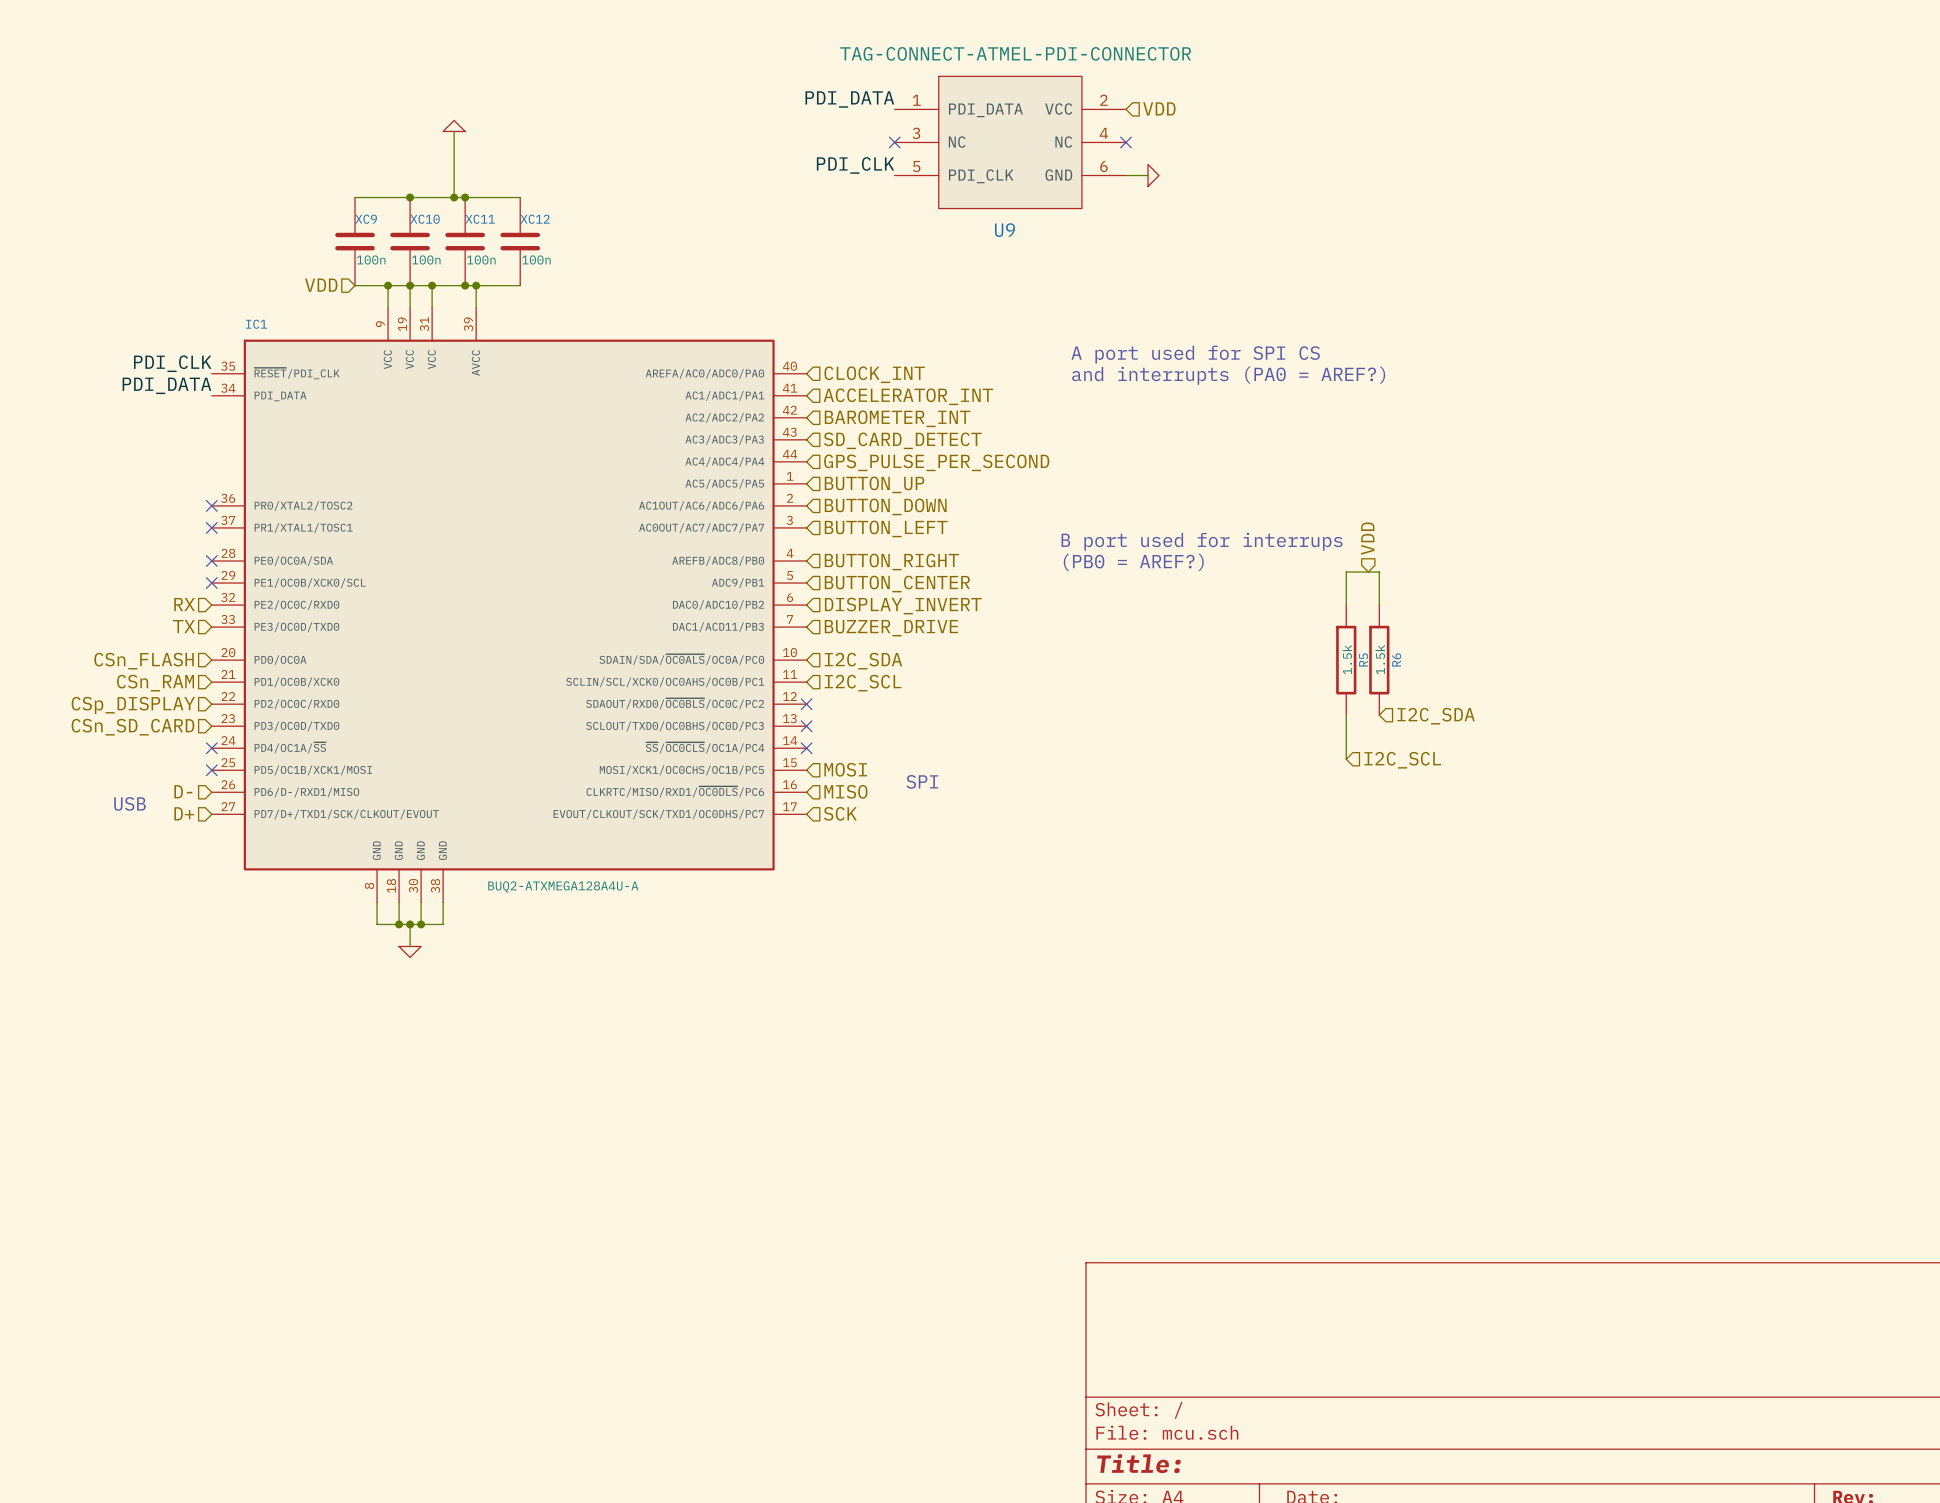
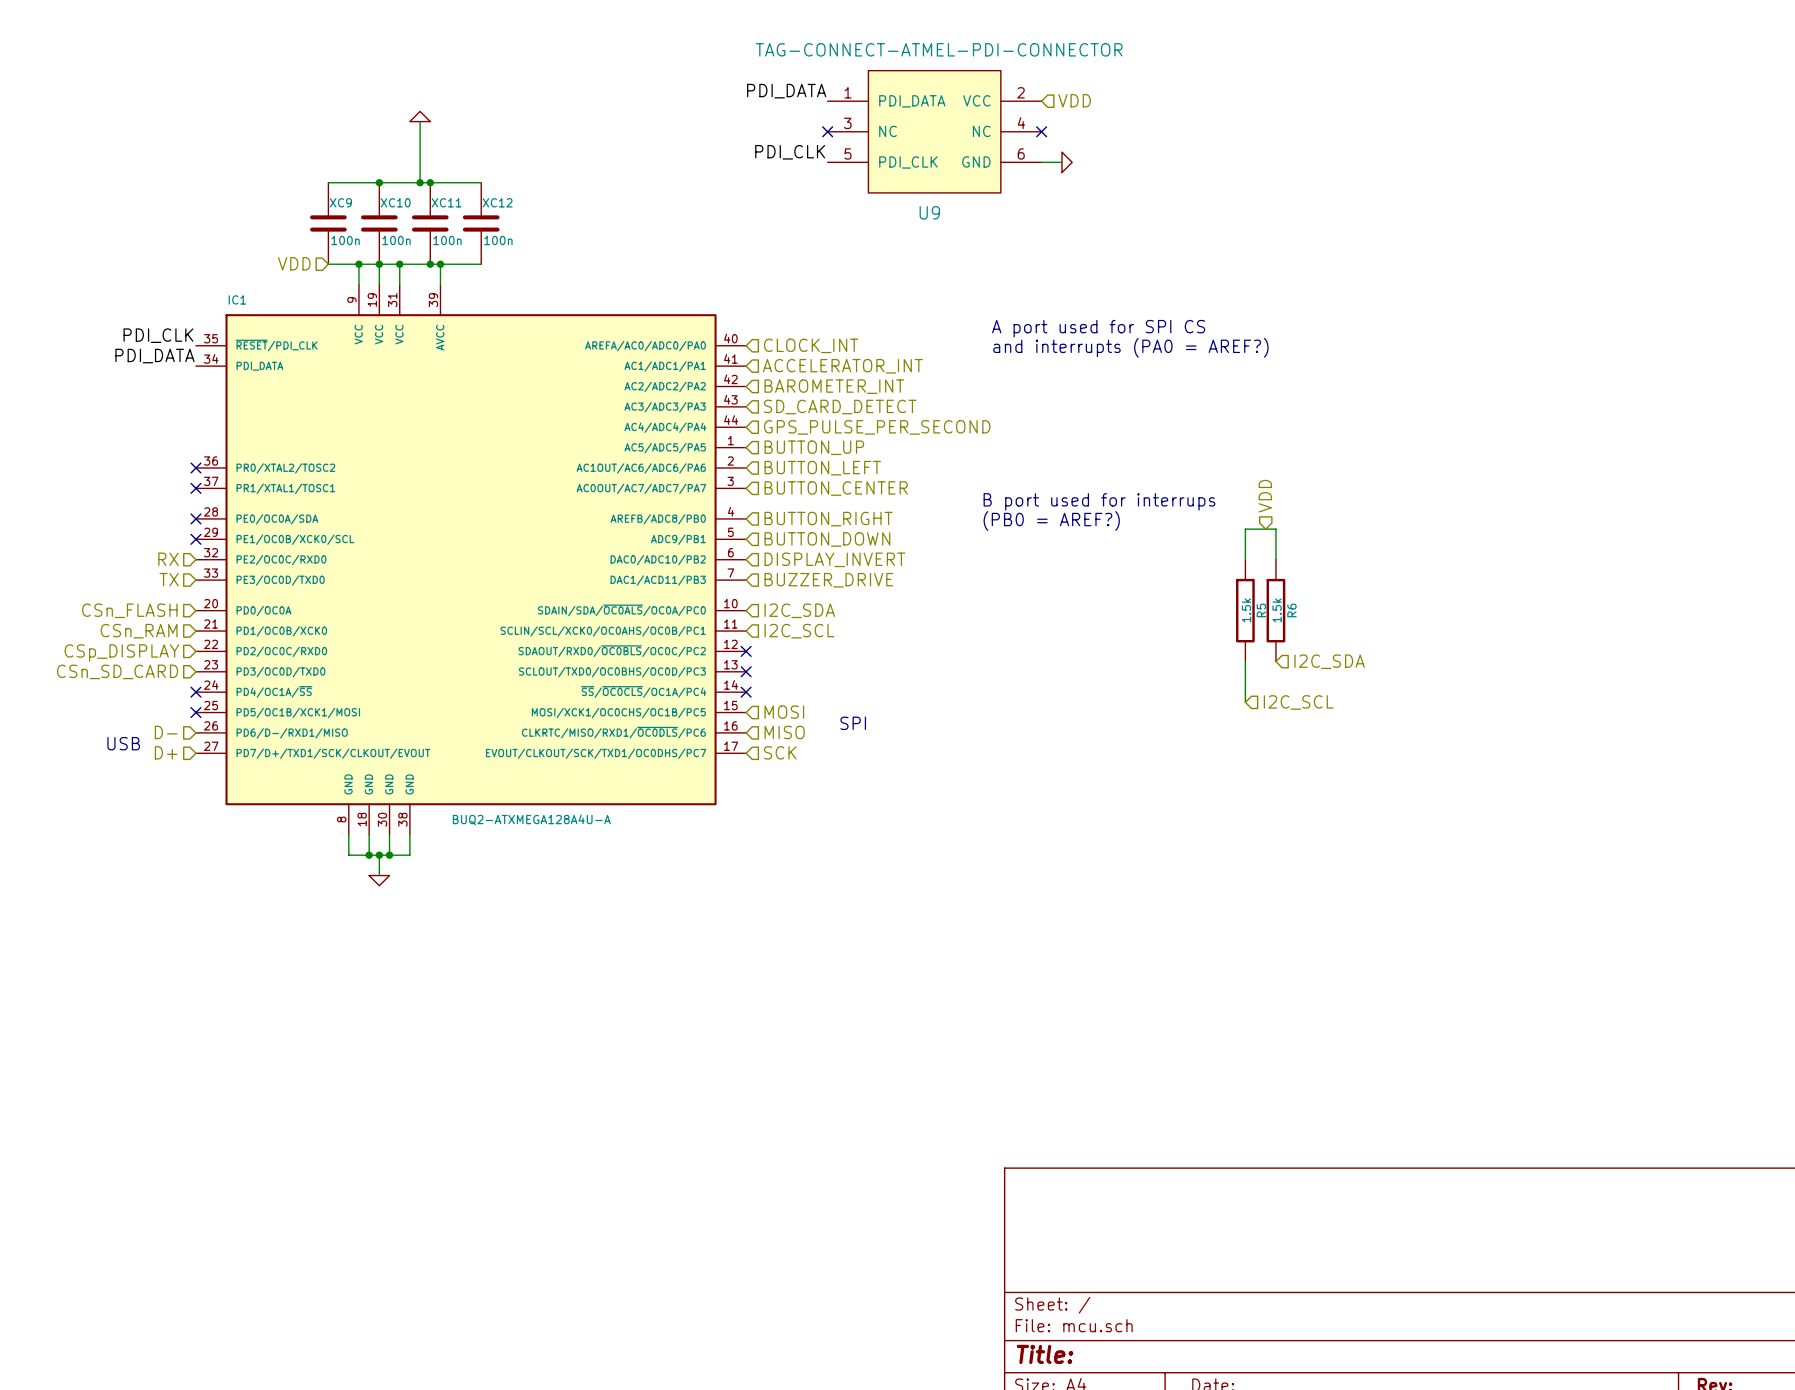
hierarchical label: BUTTON_DOWN (885, 506) -> BUTTON_LEFT (822, 468)
hierarchical label: BUTTON_LEFT (886, 528) -> BUTTON_CENTER (836, 488)
hierarchical label: BUTTON_CENTER (897, 584) -> BUTTON_DOWN (827, 539)

